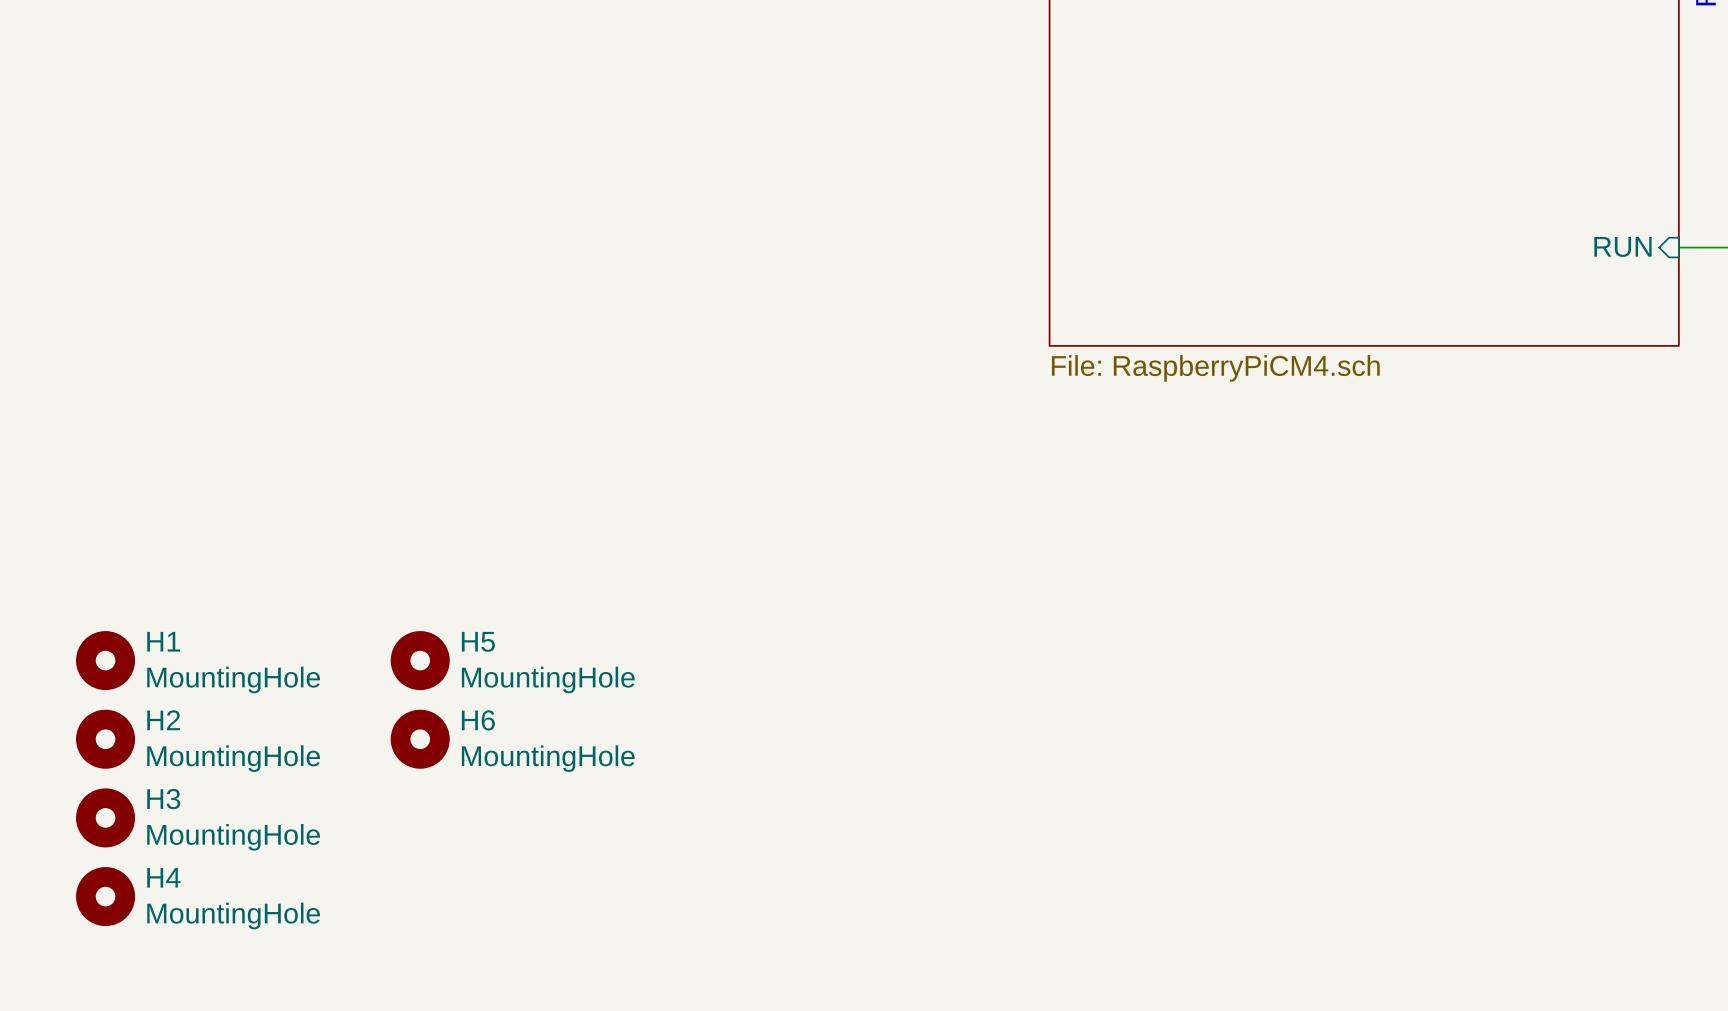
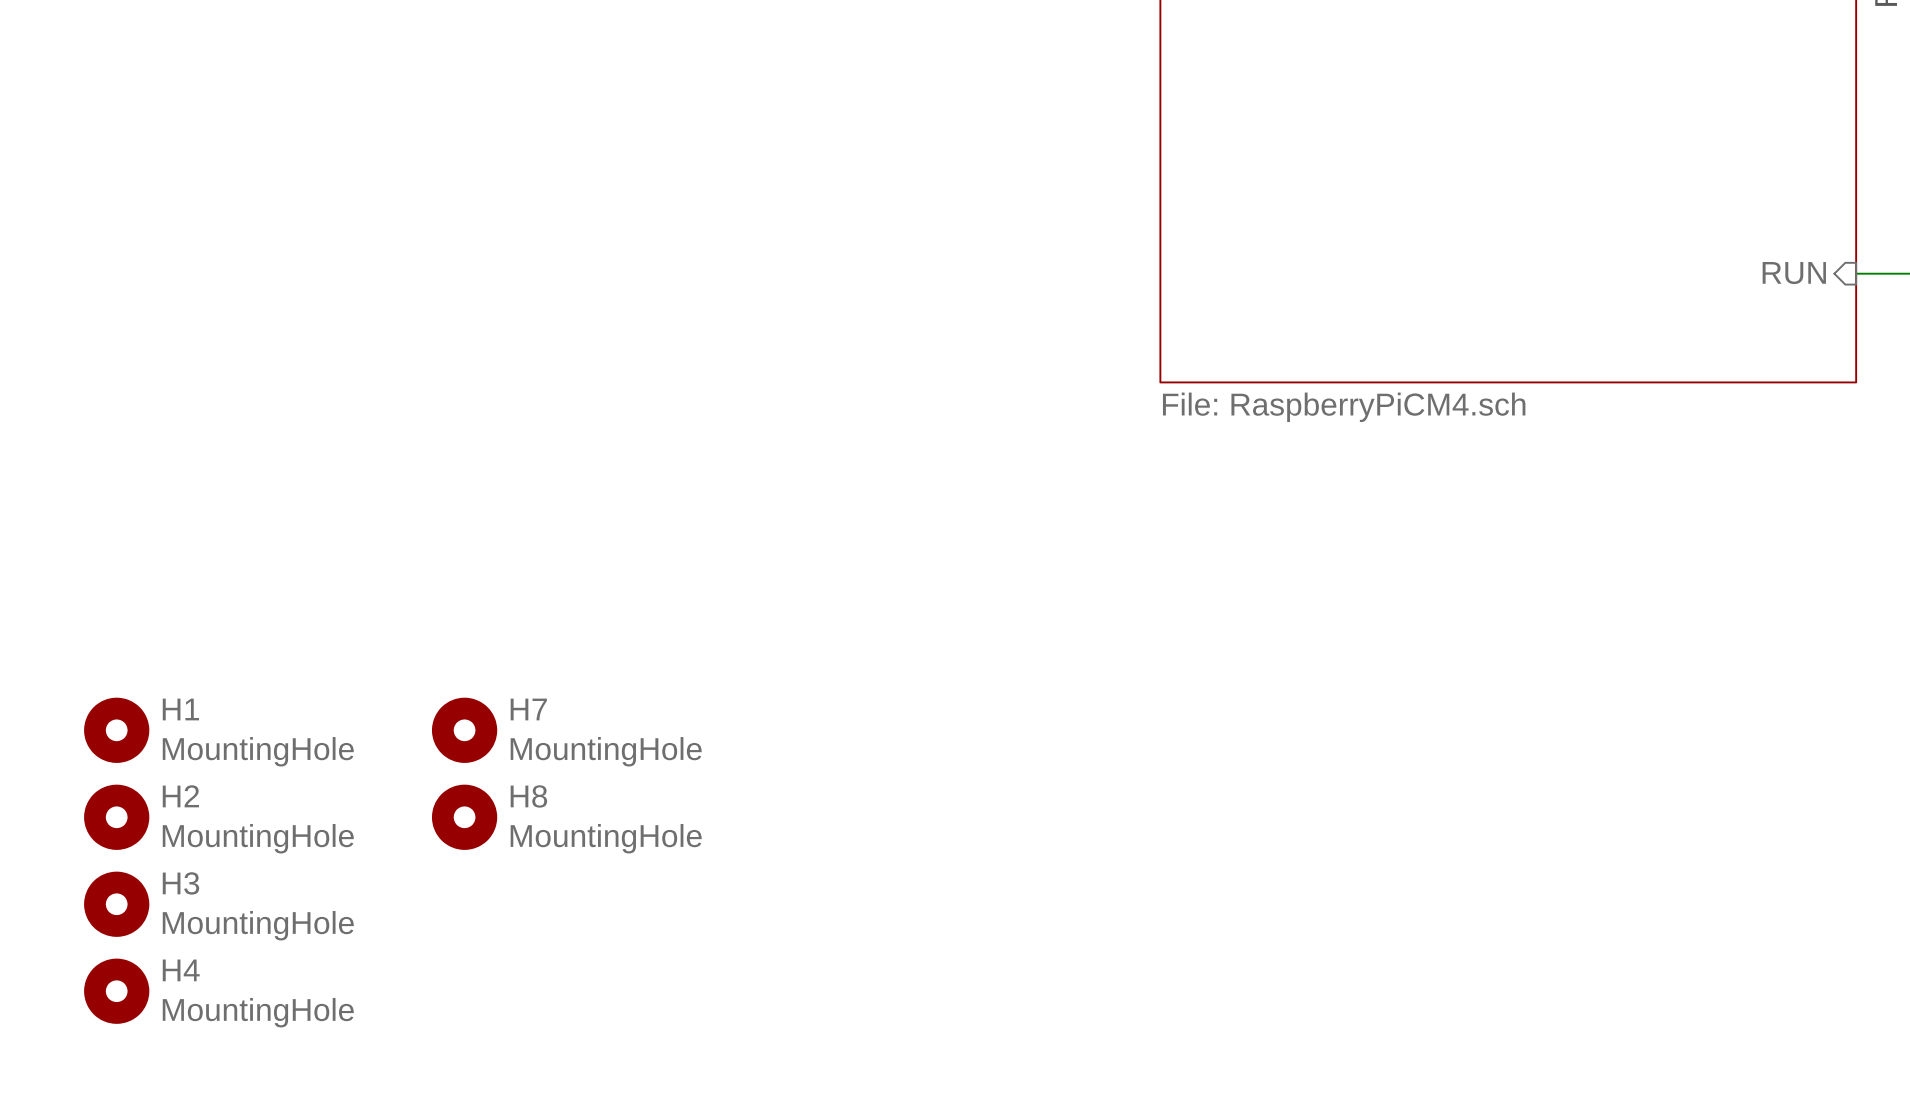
H5 name: H5 (478, 641) -> H7 (528, 709)
H6 name: H6 (478, 720) -> H8 (528, 796)

